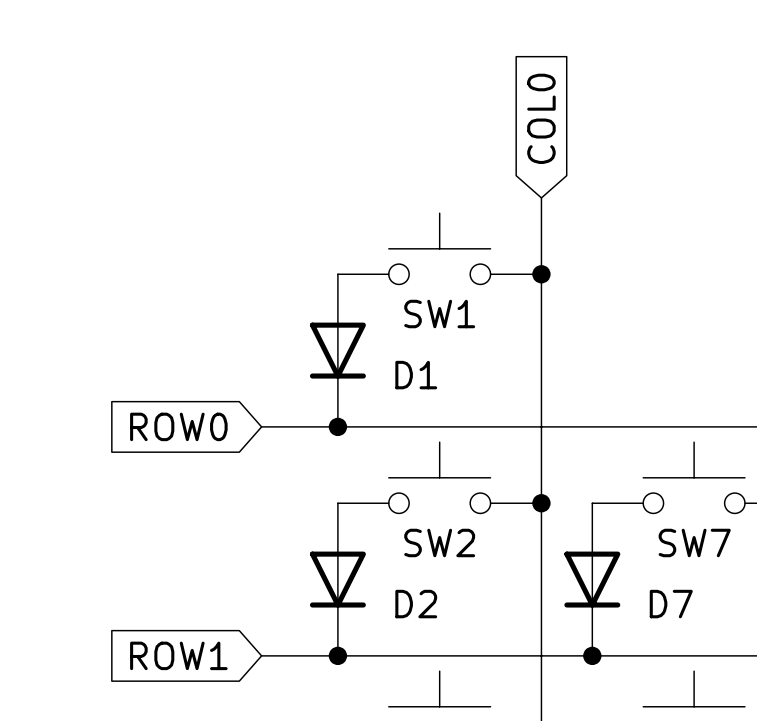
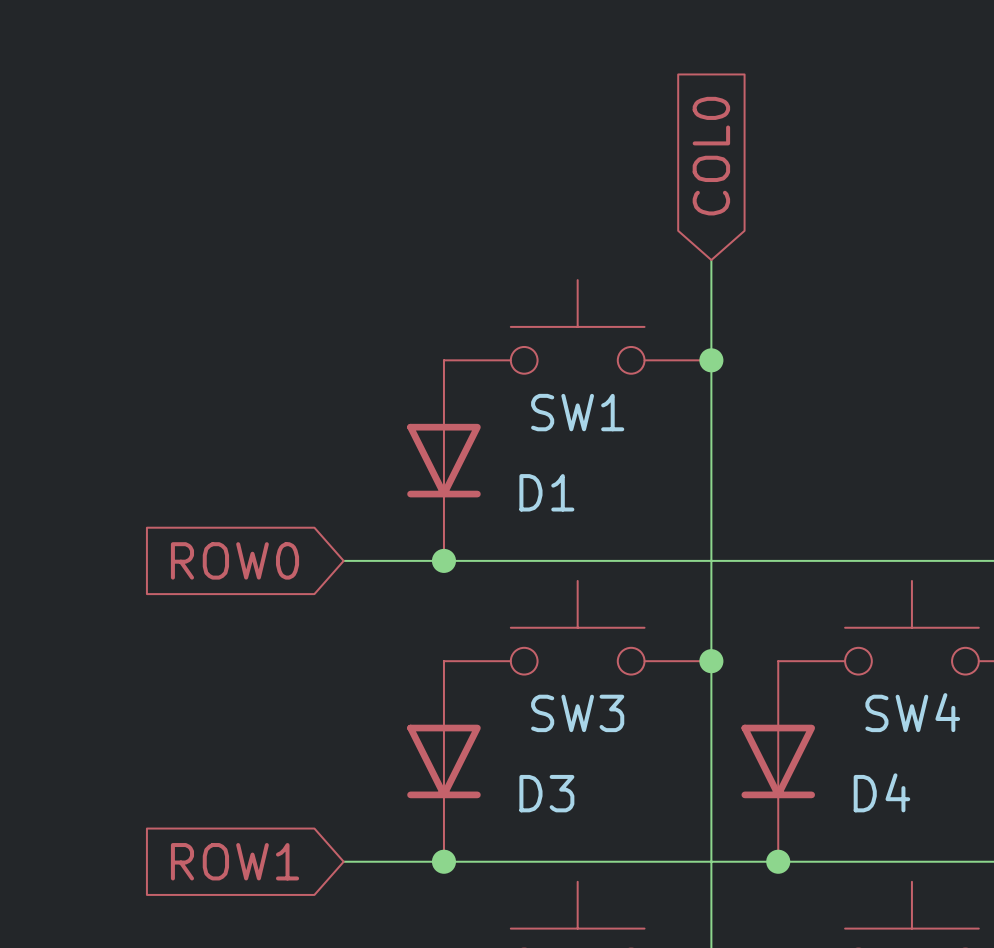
SW2 name: SW2 (439, 542) -> SW3 (577, 713)
SW7 name: SW7 (694, 542) -> SW4 (912, 712)
D2 name: D2 (416, 604) -> D3 (546, 793)
D7 name: D7 (671, 604) -> D4 (881, 792)

